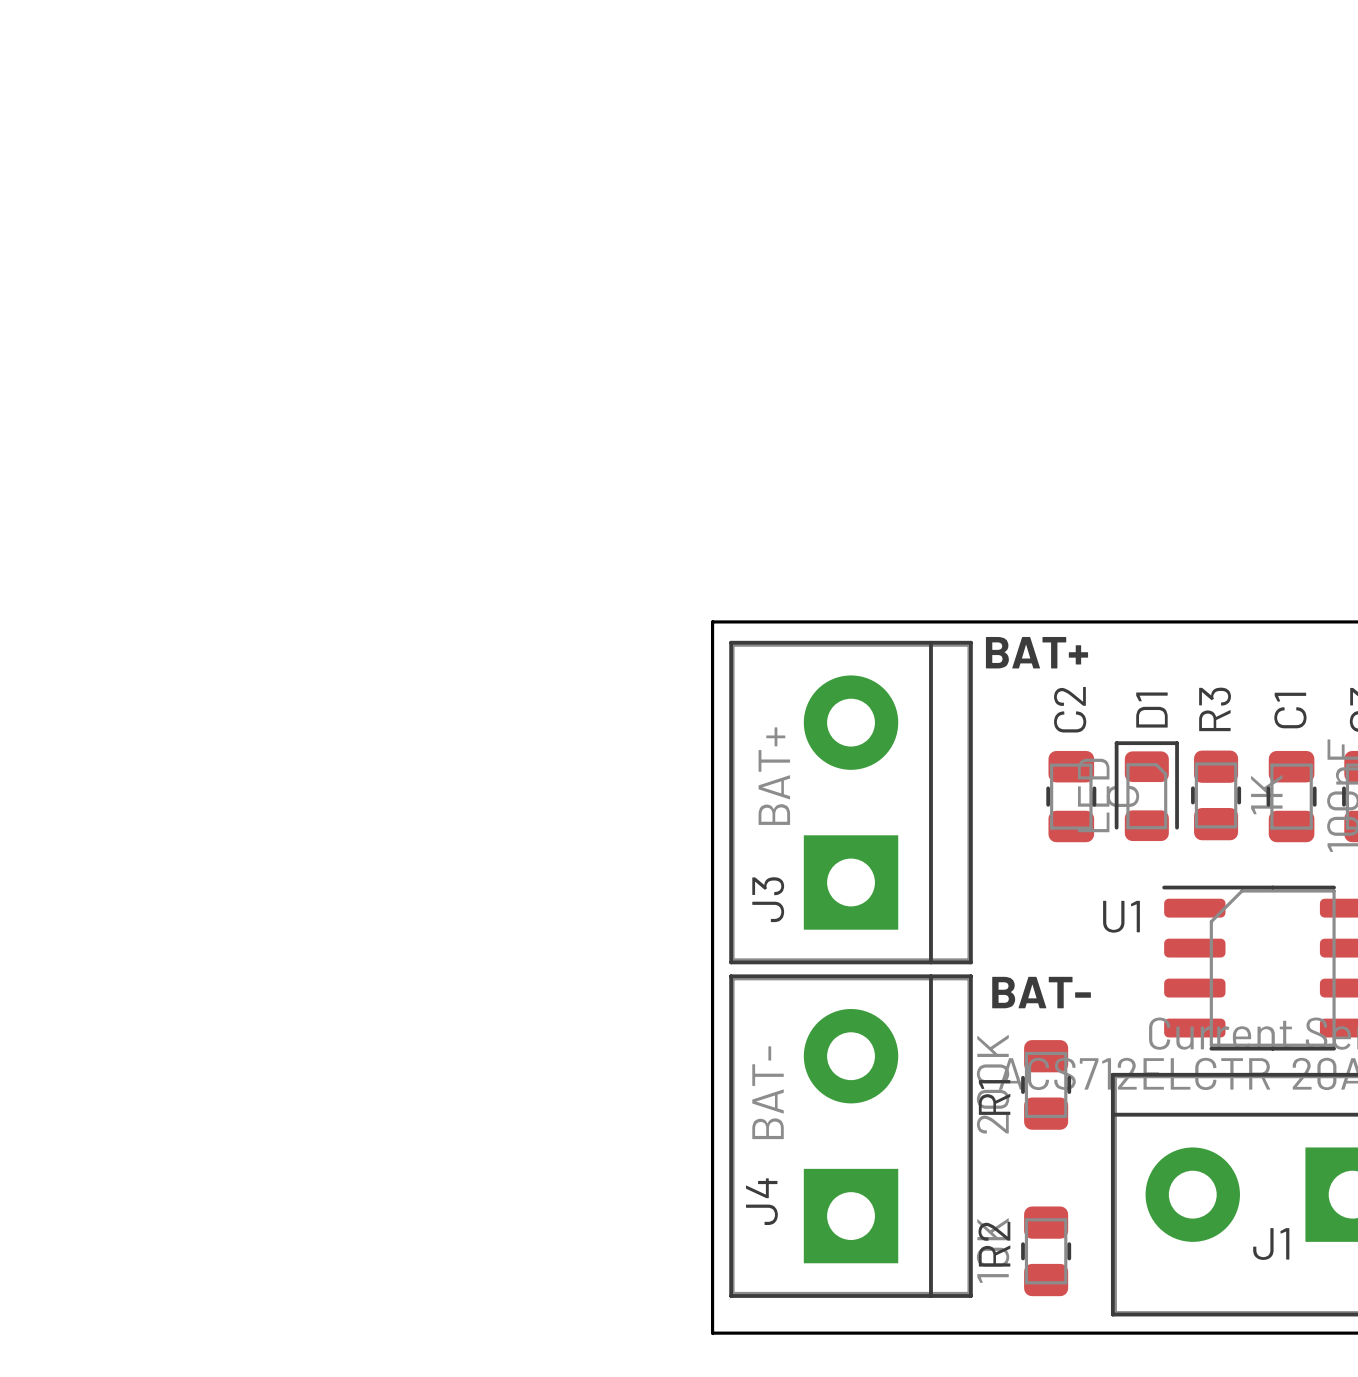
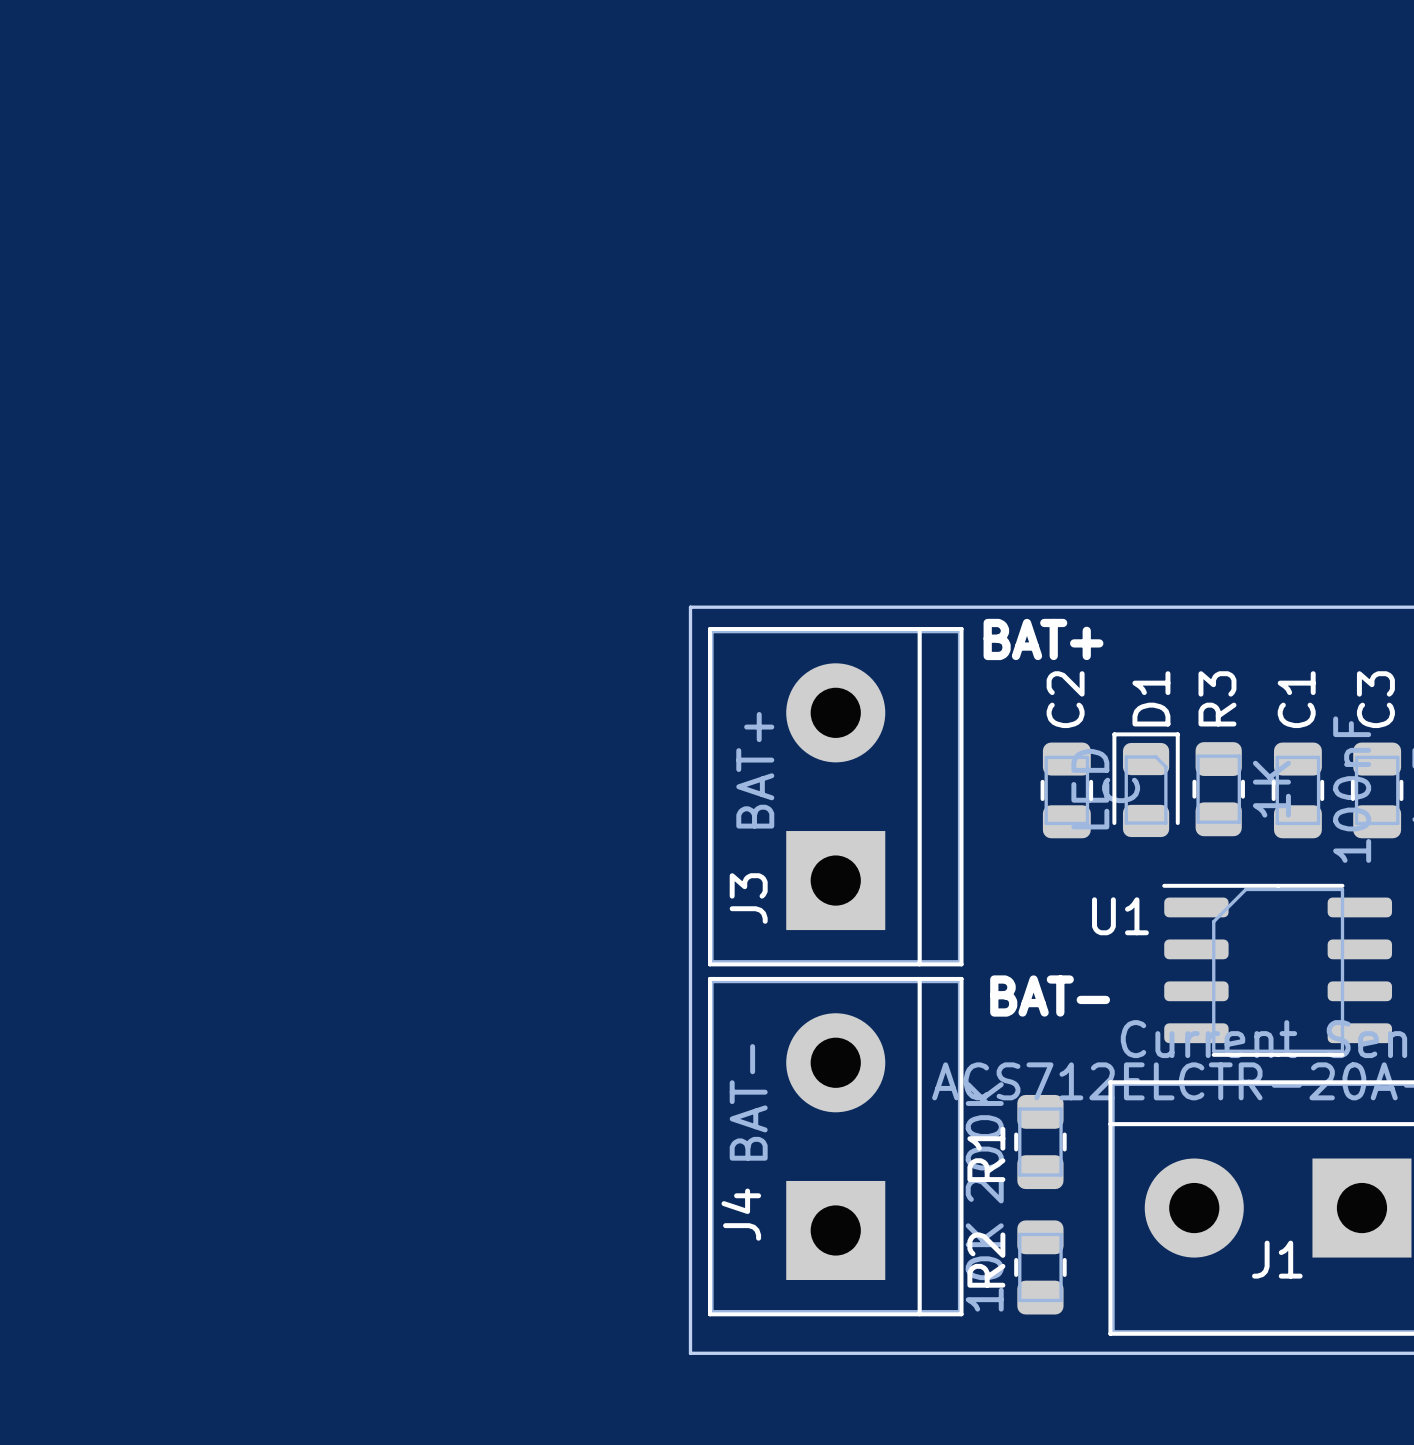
R1 position: (1046, 1084) -> (1040, 1142)

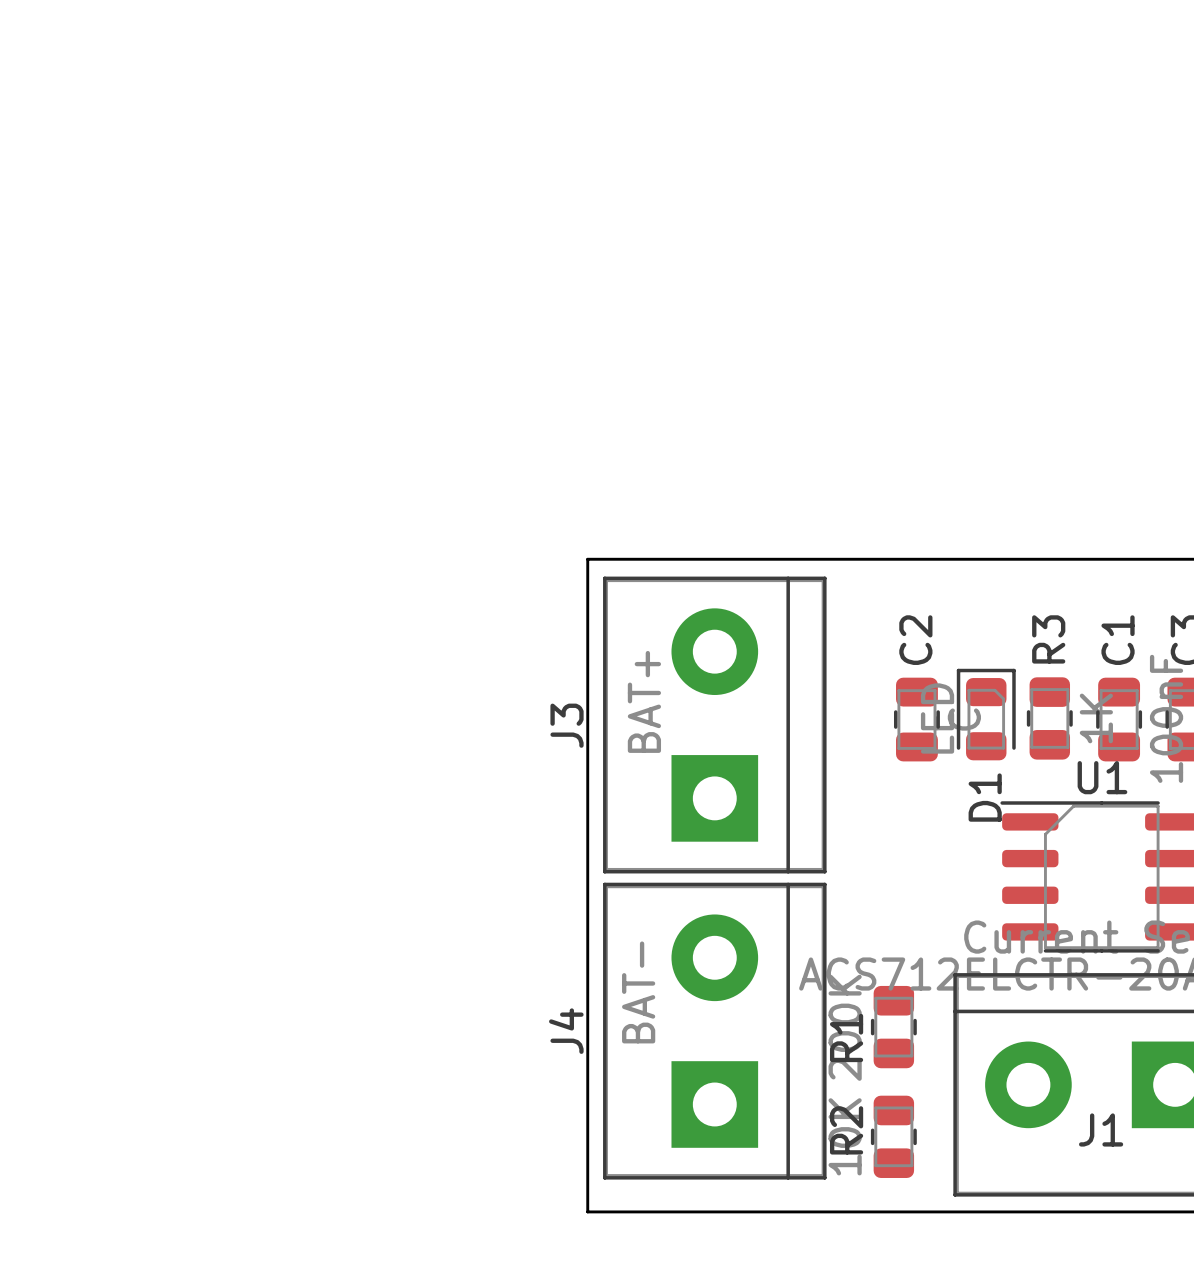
text: BAT+ (1043, 639) -> none
D1 name position: D1 (1151, 698) -> D1 (985, 797)
J3 name position: J3 (748, 898) -> J3 (567, 725)
U1 name position: U1 (1120, 916) -> U1 (1102, 777)
text: BAT- (1050, 996) -> none
J4 name position: J4 (741, 1214) -> J4 (566, 1031)

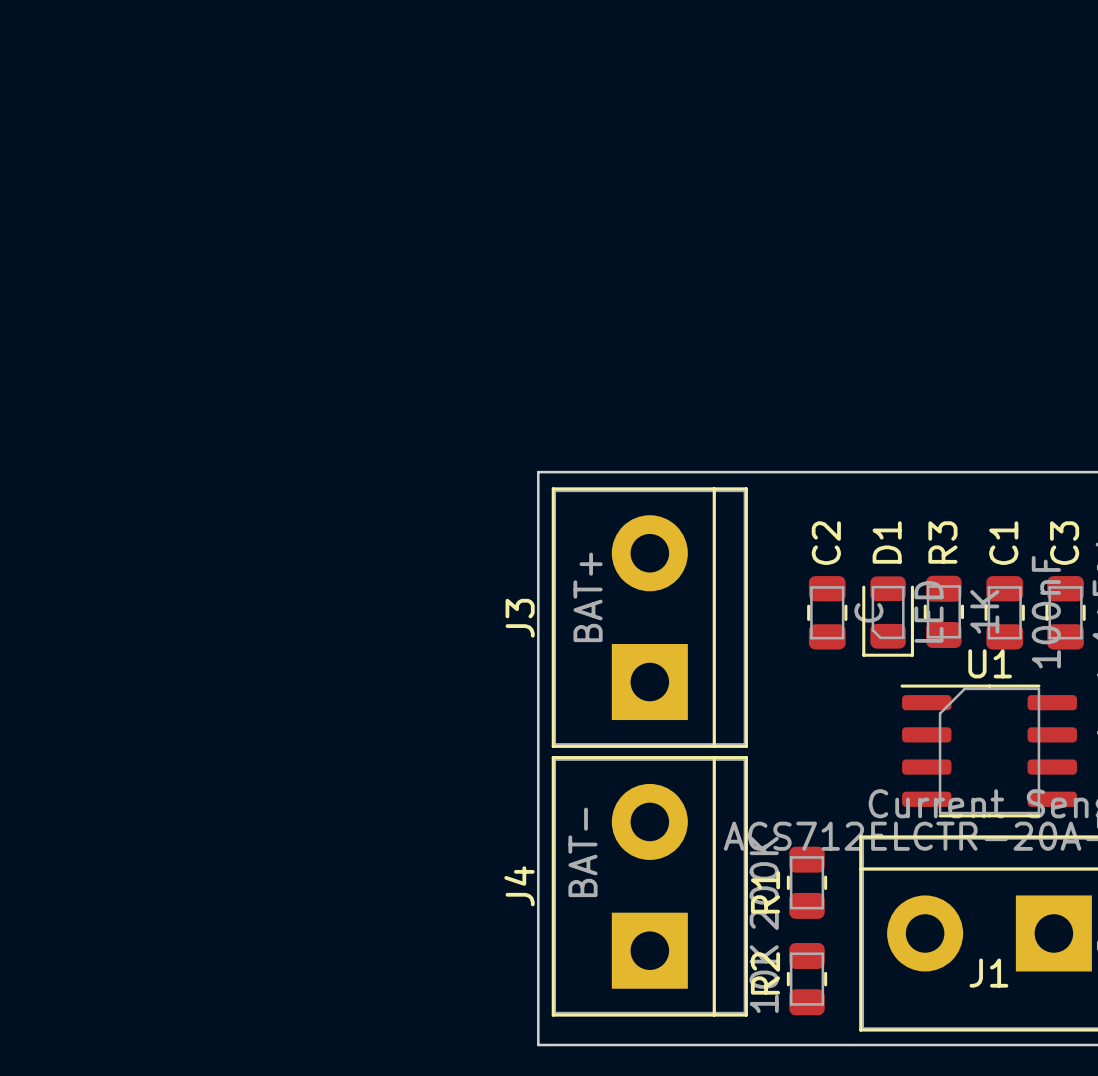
D1 rotation: 0° (986, 714) -> 180° (888, 616)

